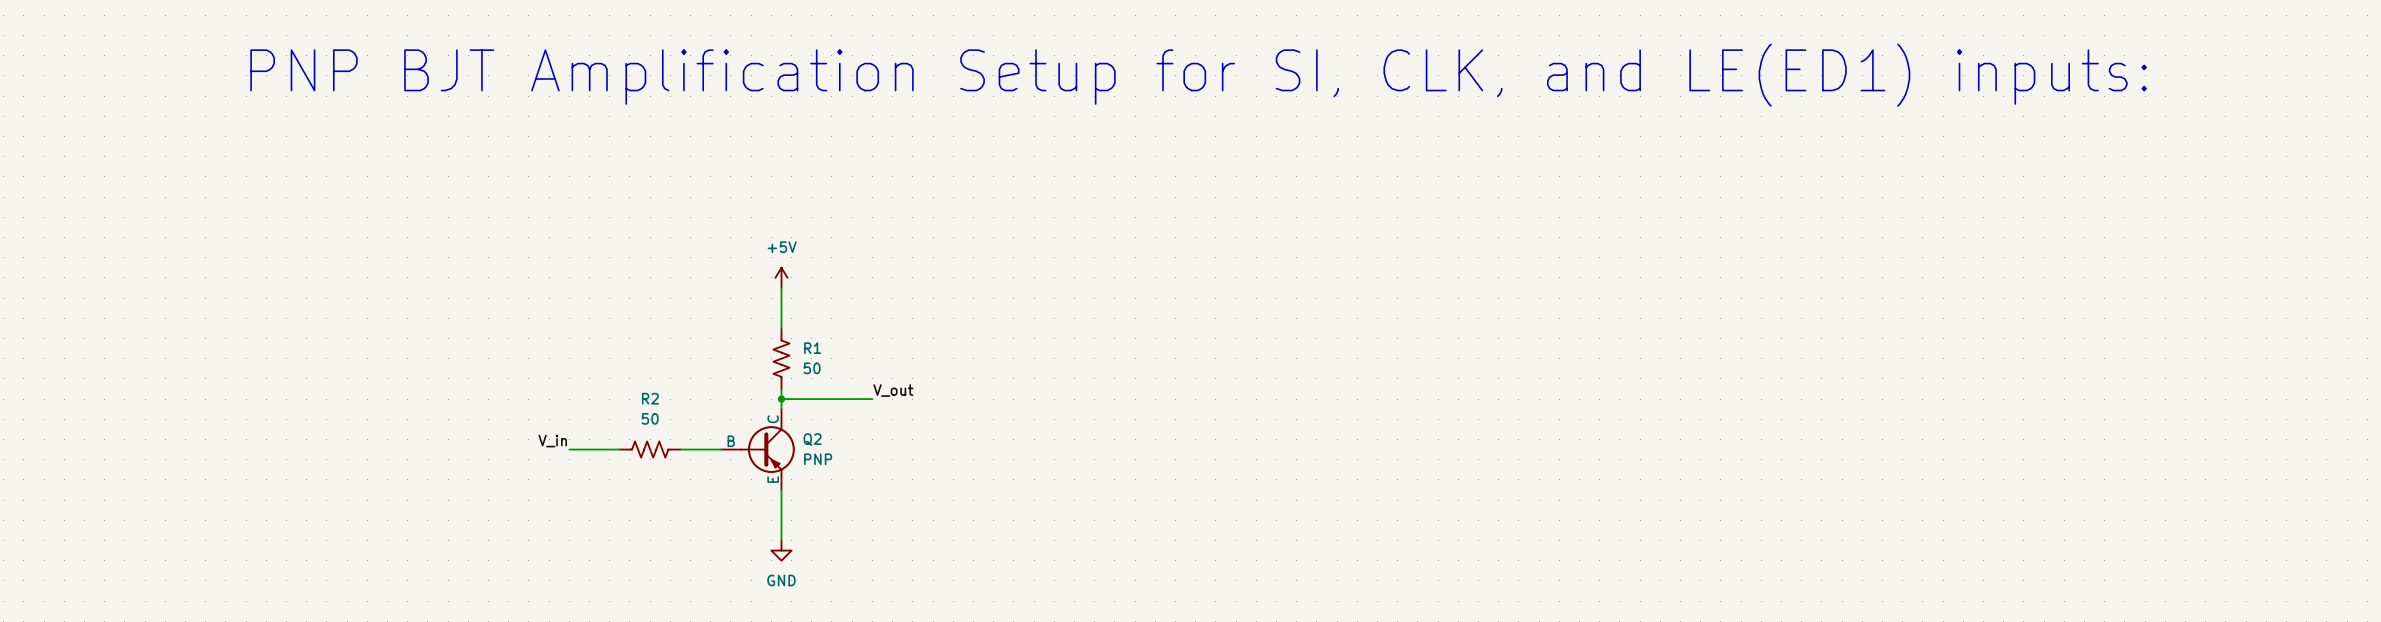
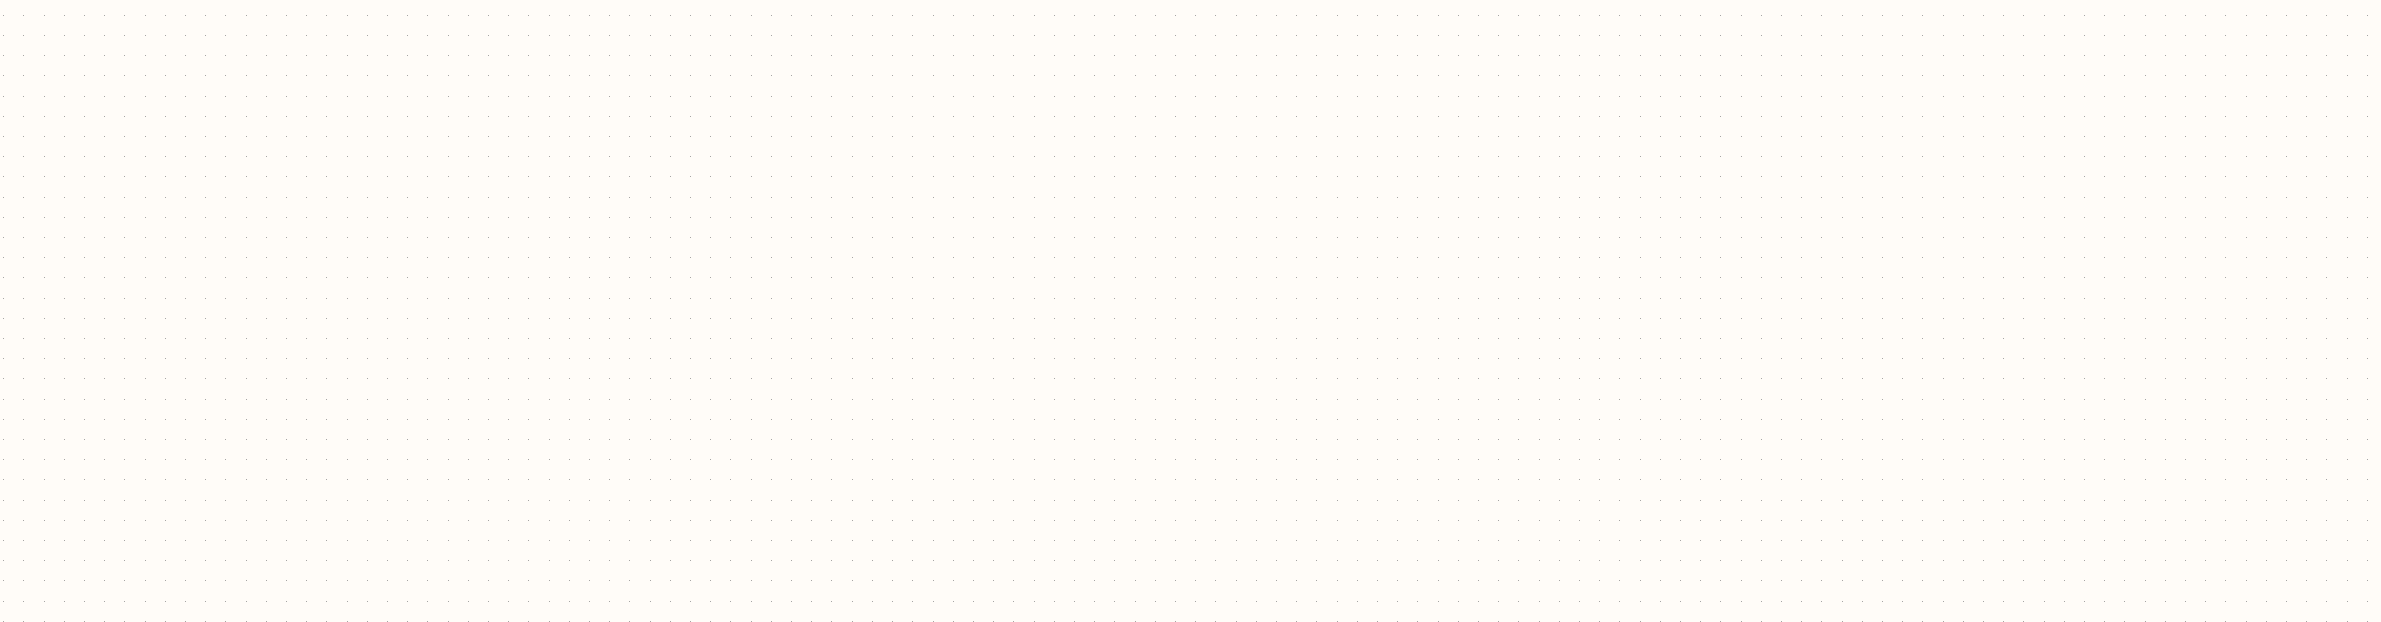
text: PNP BJT Amplification Setup for SI, CLK, and LE(ED1) inputs: (1198, 75) -> none
power symbol: +5V (781, 277) -> none
wire: (781, 287) (781, 328) -> none
R1: 50 (781, 358) -> none
wire: (781, 388) (781, 409) -> none
label: V_out (893, 390) -> none
wire: (781, 399) (872, 399) -> none
junction: (781, 399) -> none
label: V_in (552, 441) -> none
wire: (569, 449) (619, 449) -> none
R2: 50 (650, 449) -> none
wire: (680, 449) (720, 449) -> none
Q2: PNP (757, 449) -> none
wire: (781, 489) (781, 540) -> none
power symbol: GND (781, 550) -> none

